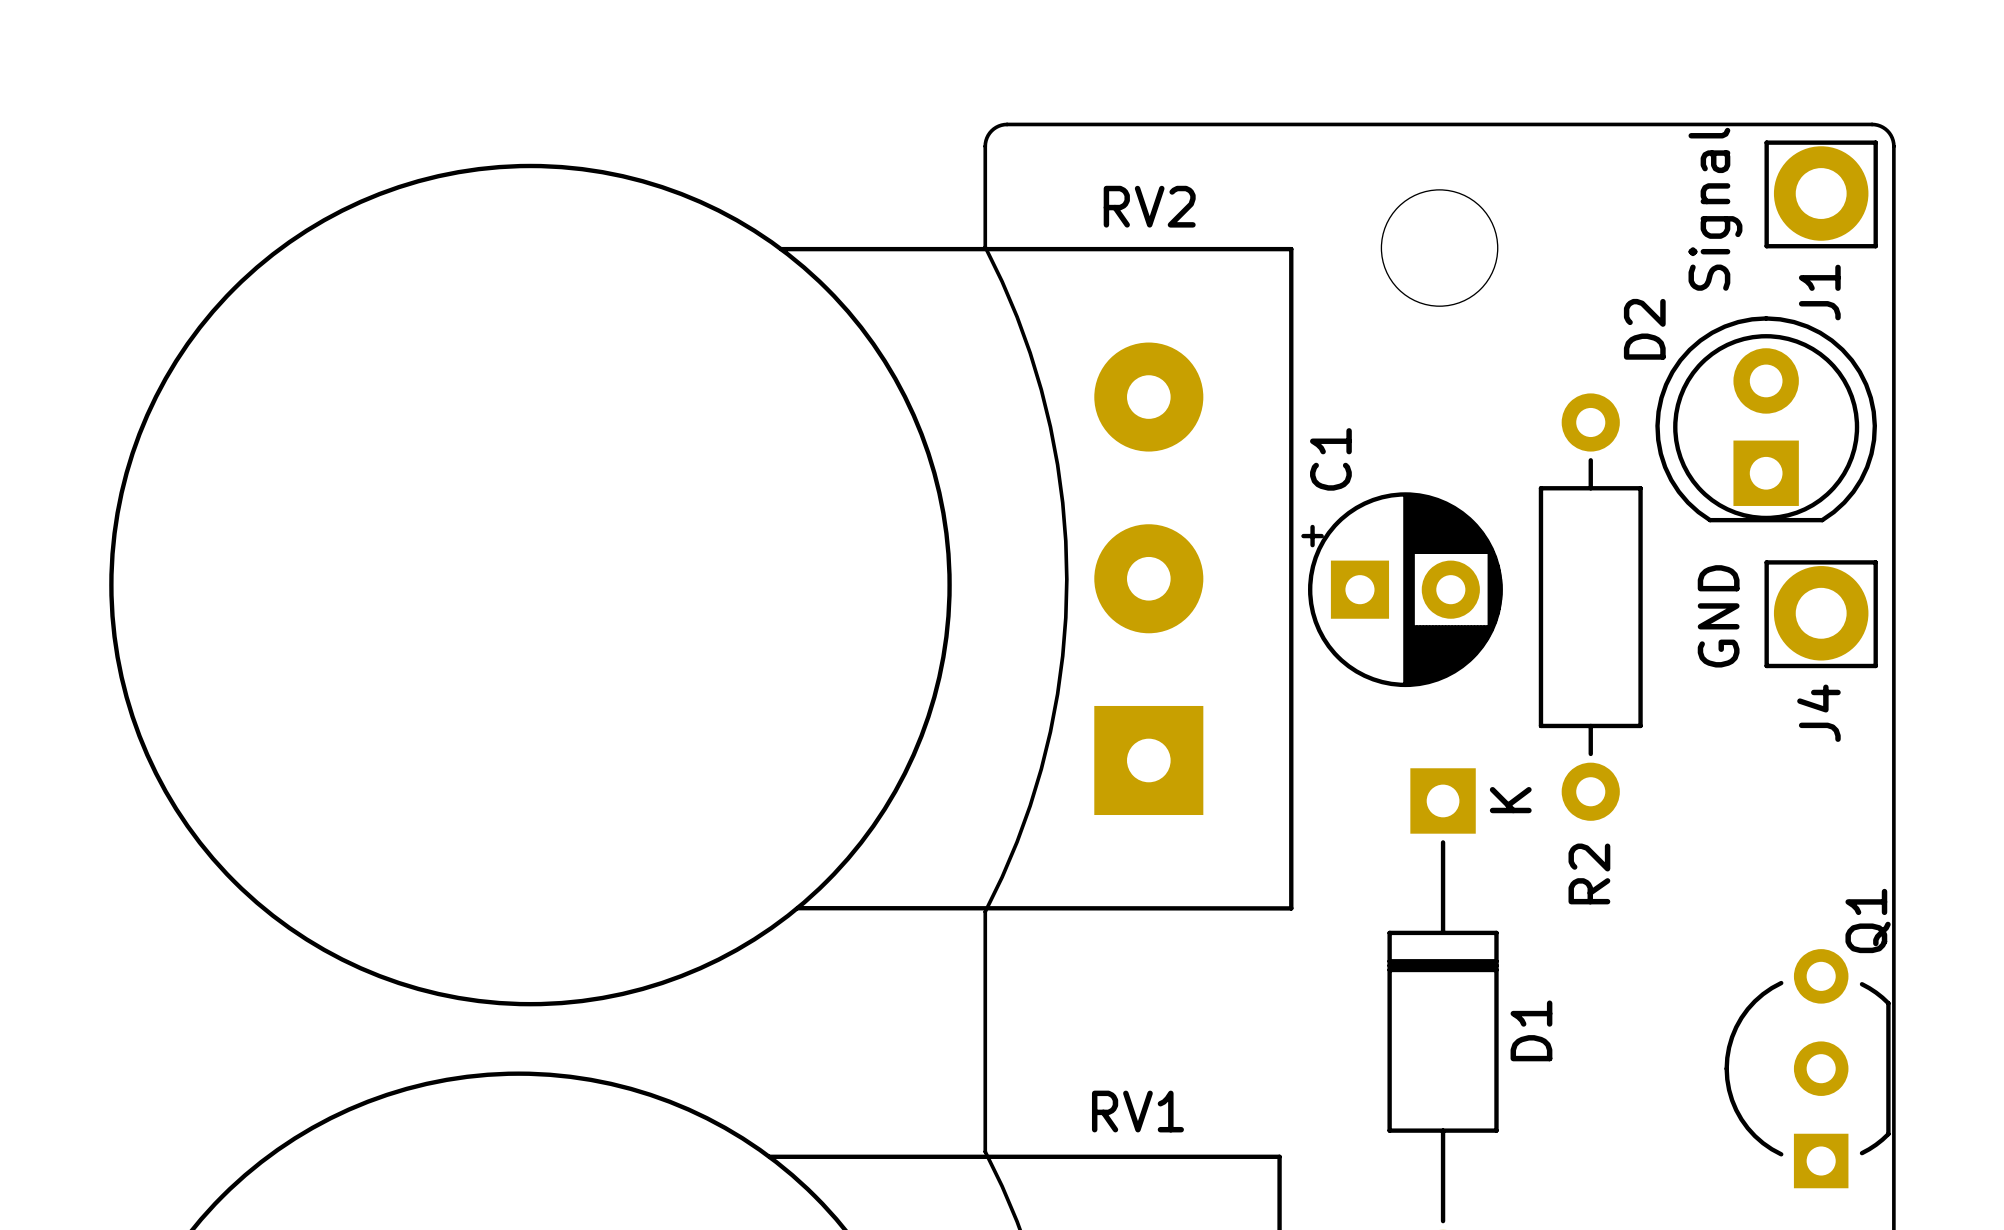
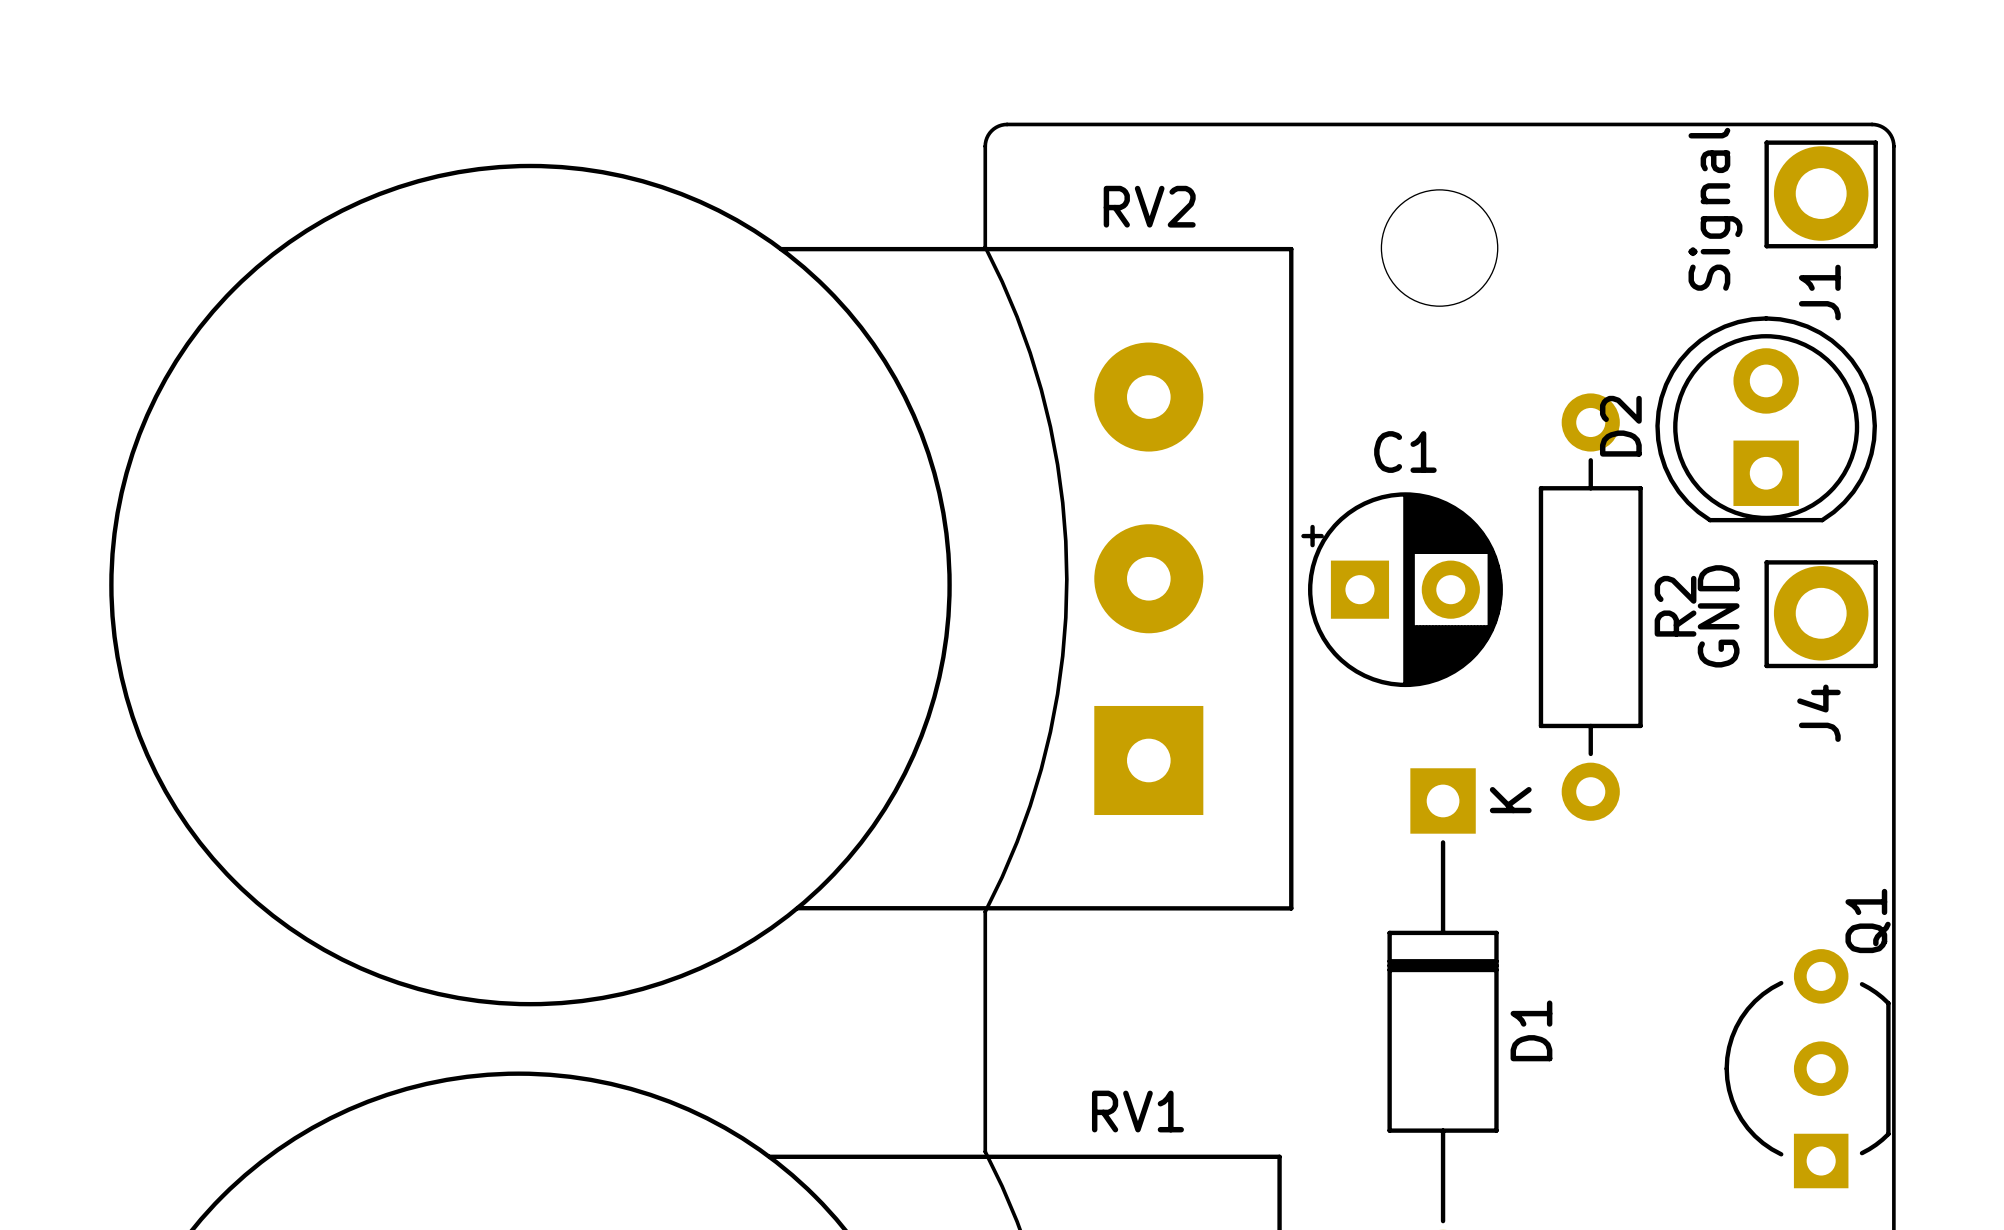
D2 name position: D2 (1644, 329) -> D2 (1620, 426)
C1 name rotation: 0° (1330, 459) -> 90° clockwise (1405, 452)
R2 name position: R2 (1589, 873) -> R2 (1675, 606)

